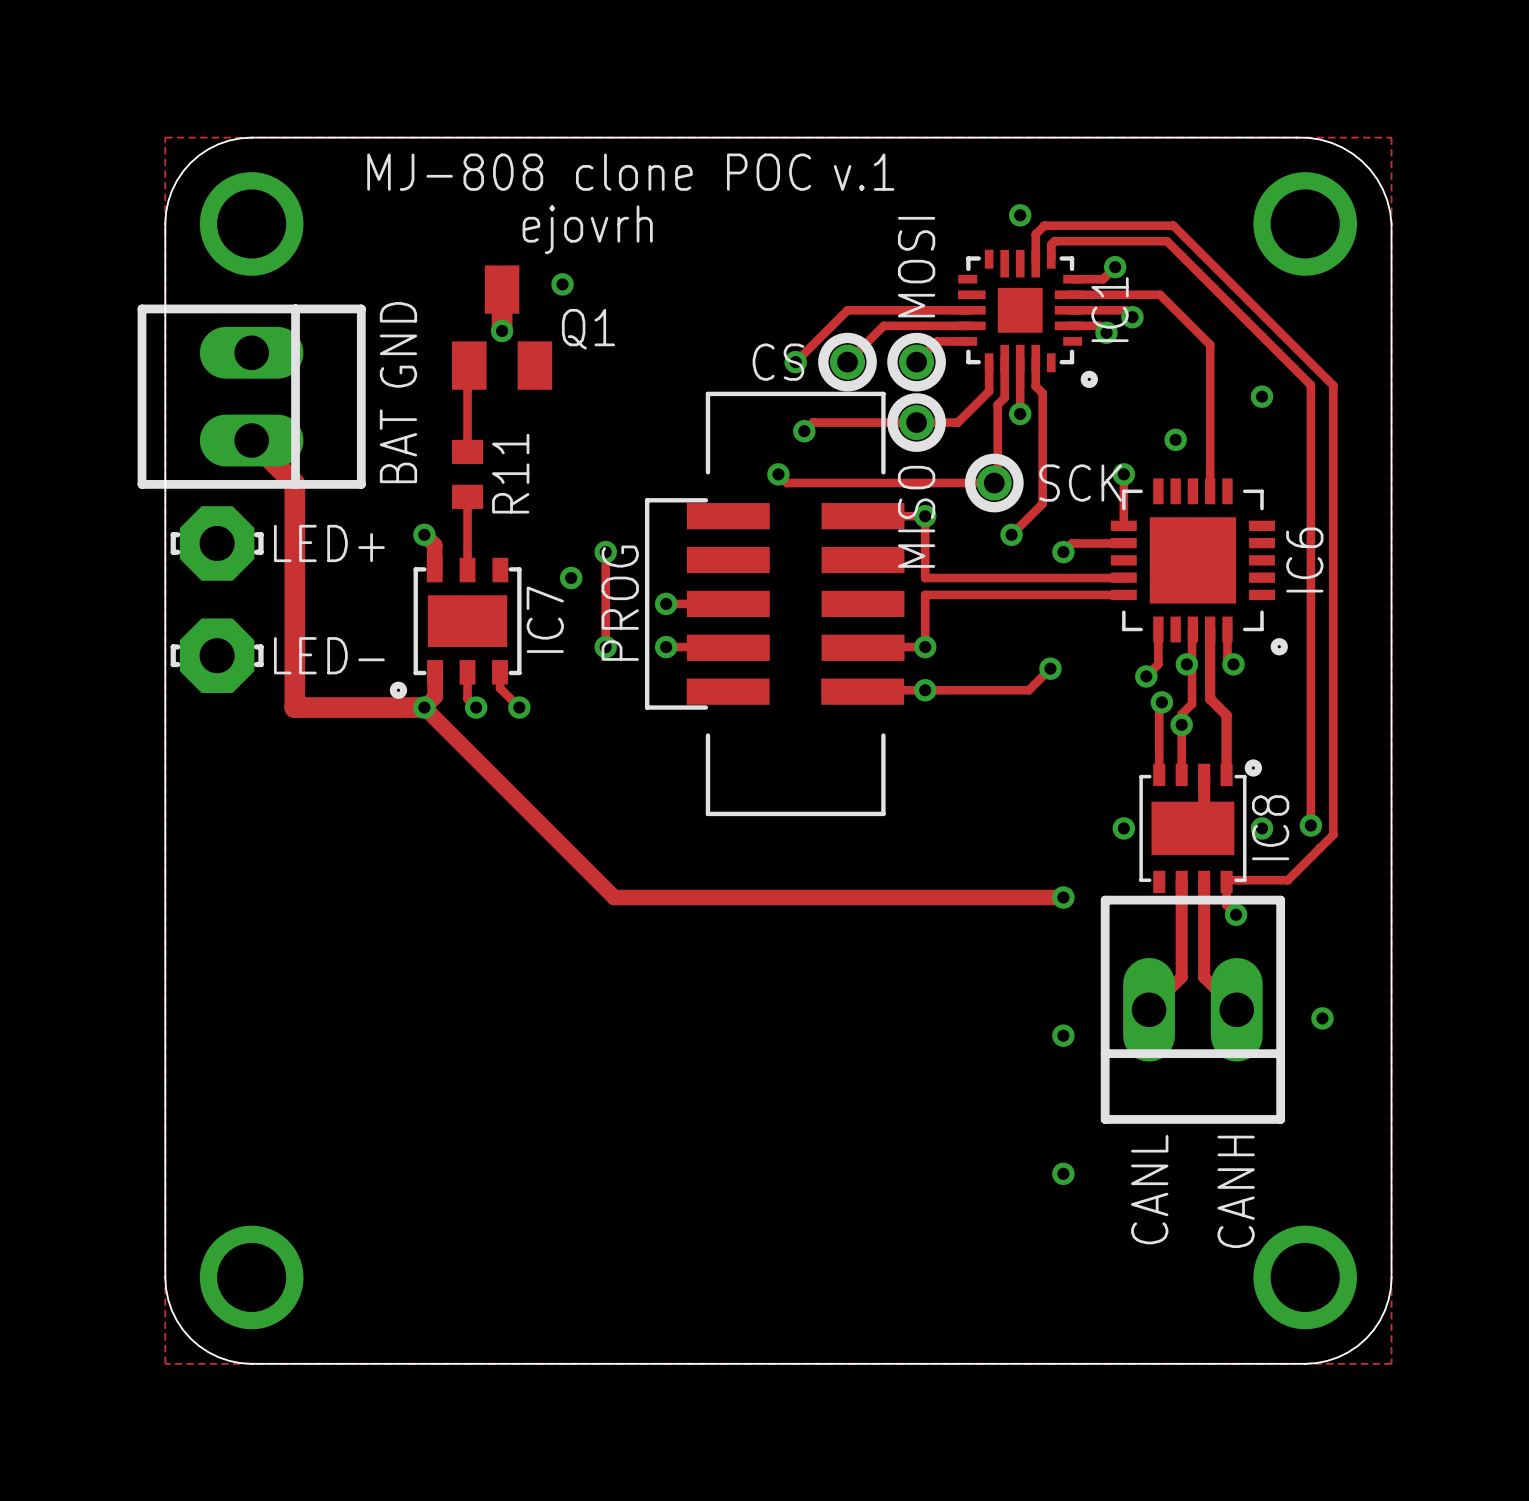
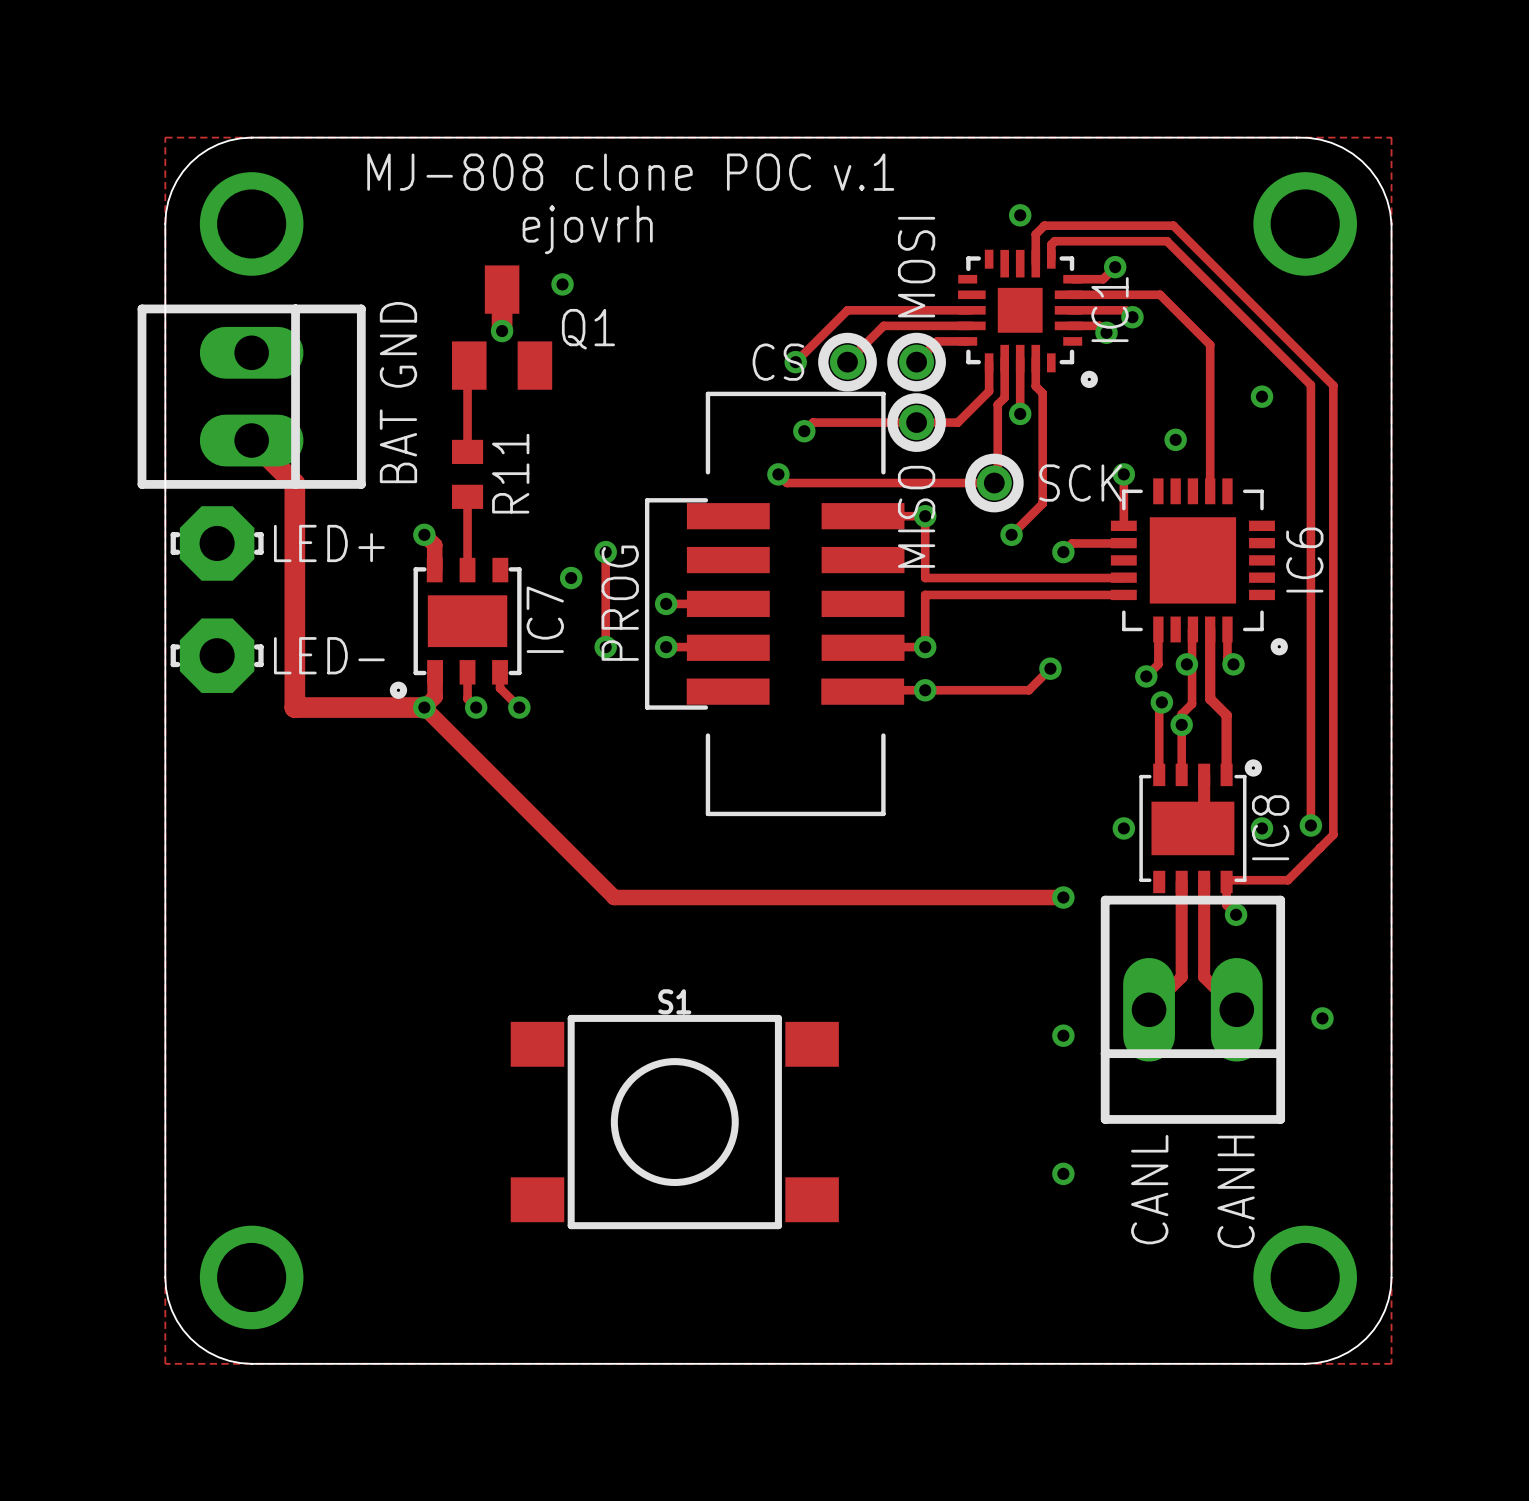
S1: none -> (674, 1122)

